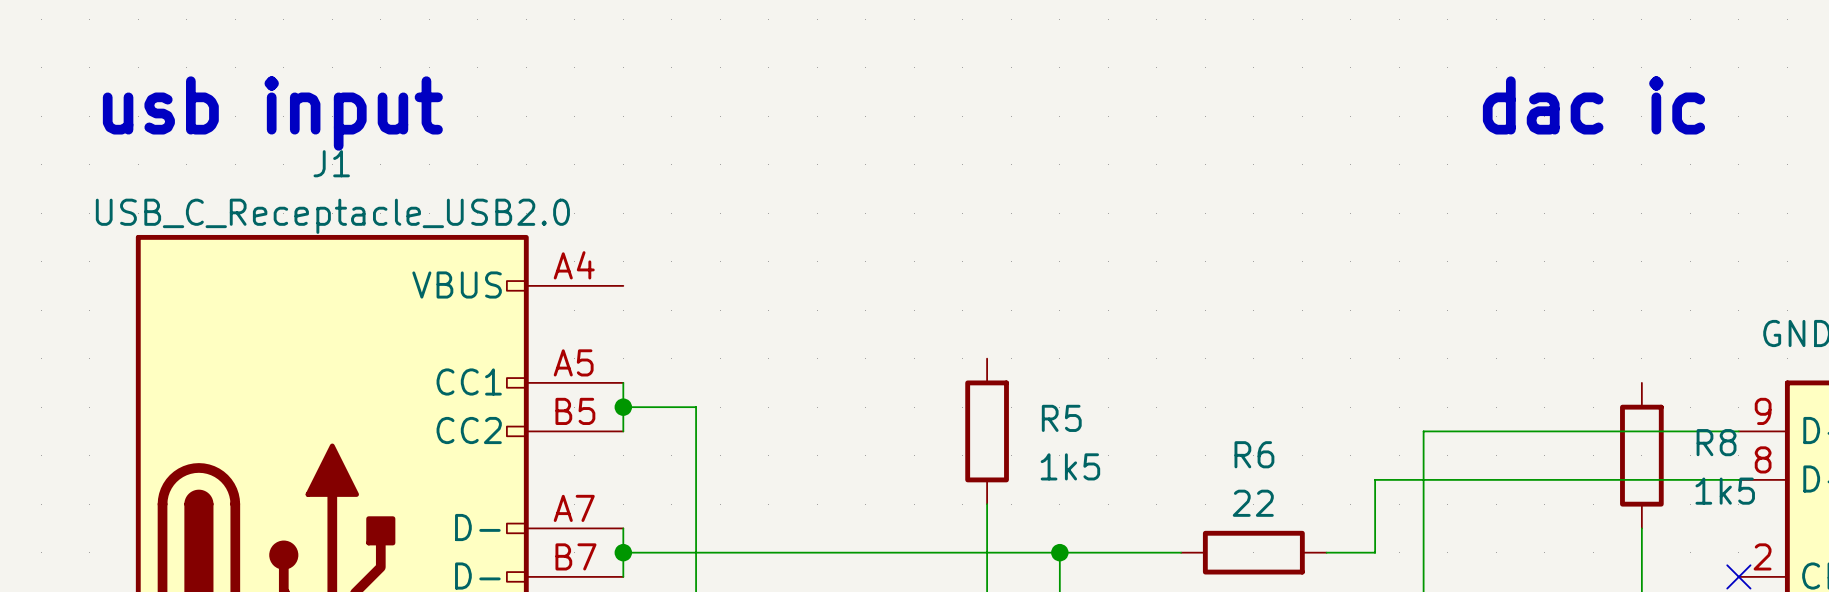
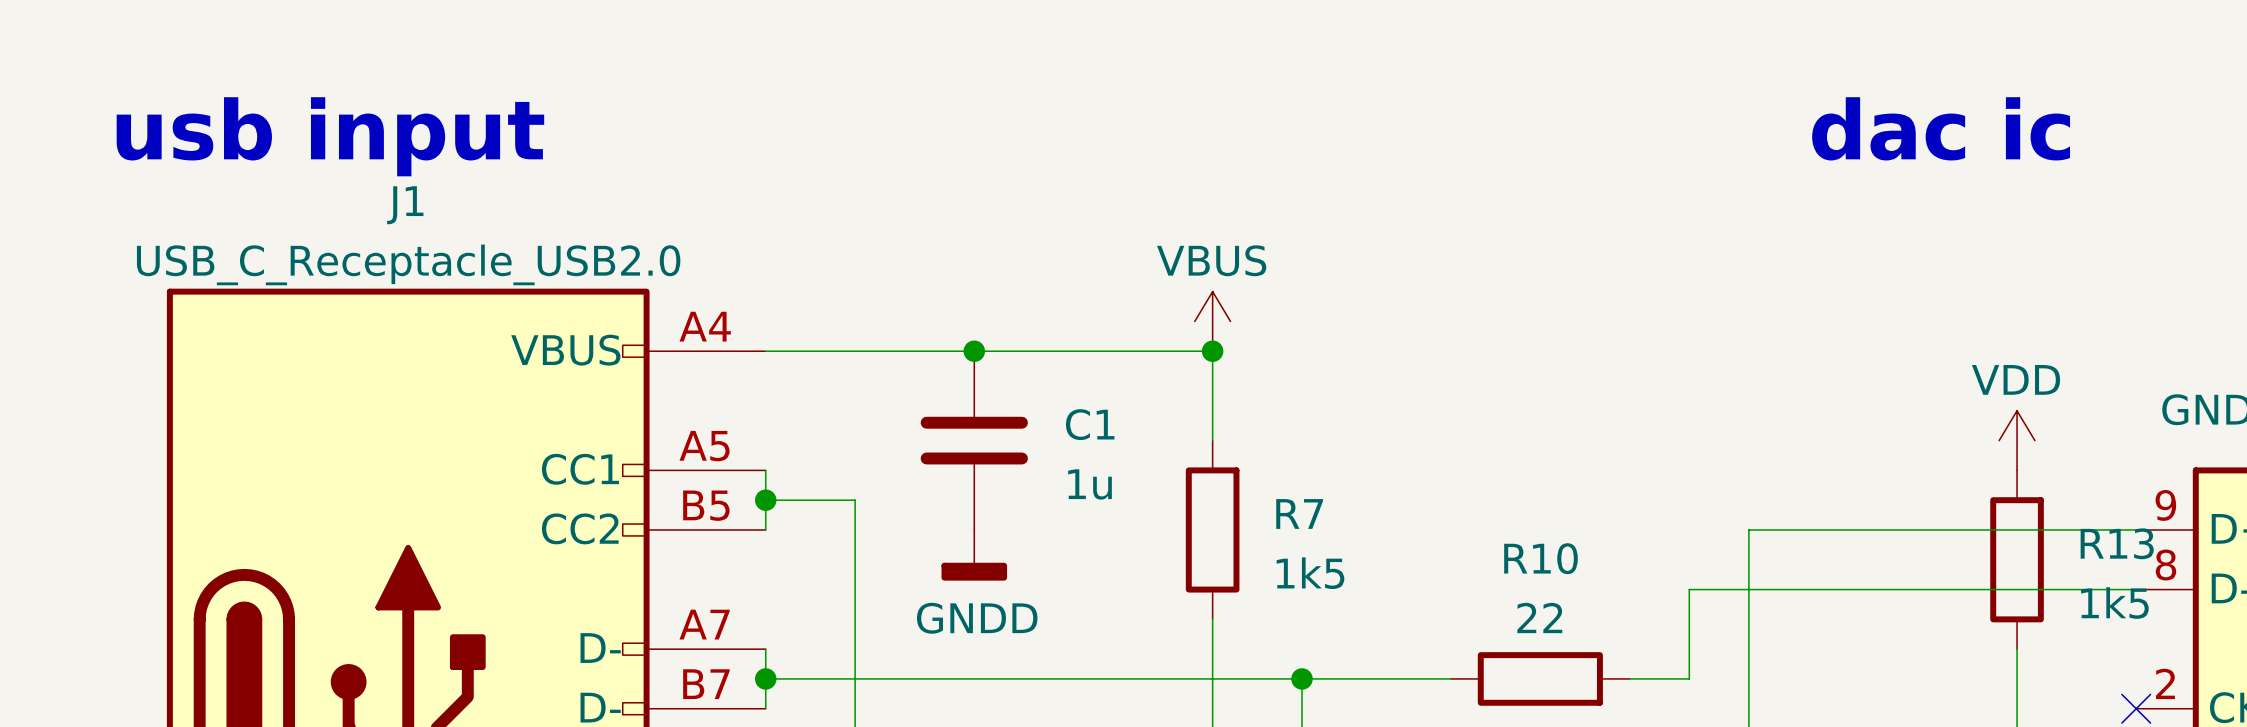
power symbol: none -> VBUS (1212, 321)
wire: none -> (765, 351) (1212, 351) (1212, 440)
junction: none -> (974, 351)
junction: none -> (1212, 351)
C1: none -> 1u (974, 440)
power symbol: none -> VDD (2017, 440)
R5 name: R5 (1061, 418) -> R7 (1299, 513)
R8 name: R8 (1716, 442) -> R13 (2117, 543)
power symbol: none -> GNDD (974, 555)
R6 name: R6 (1254, 454) -> R10 (1541, 558)

